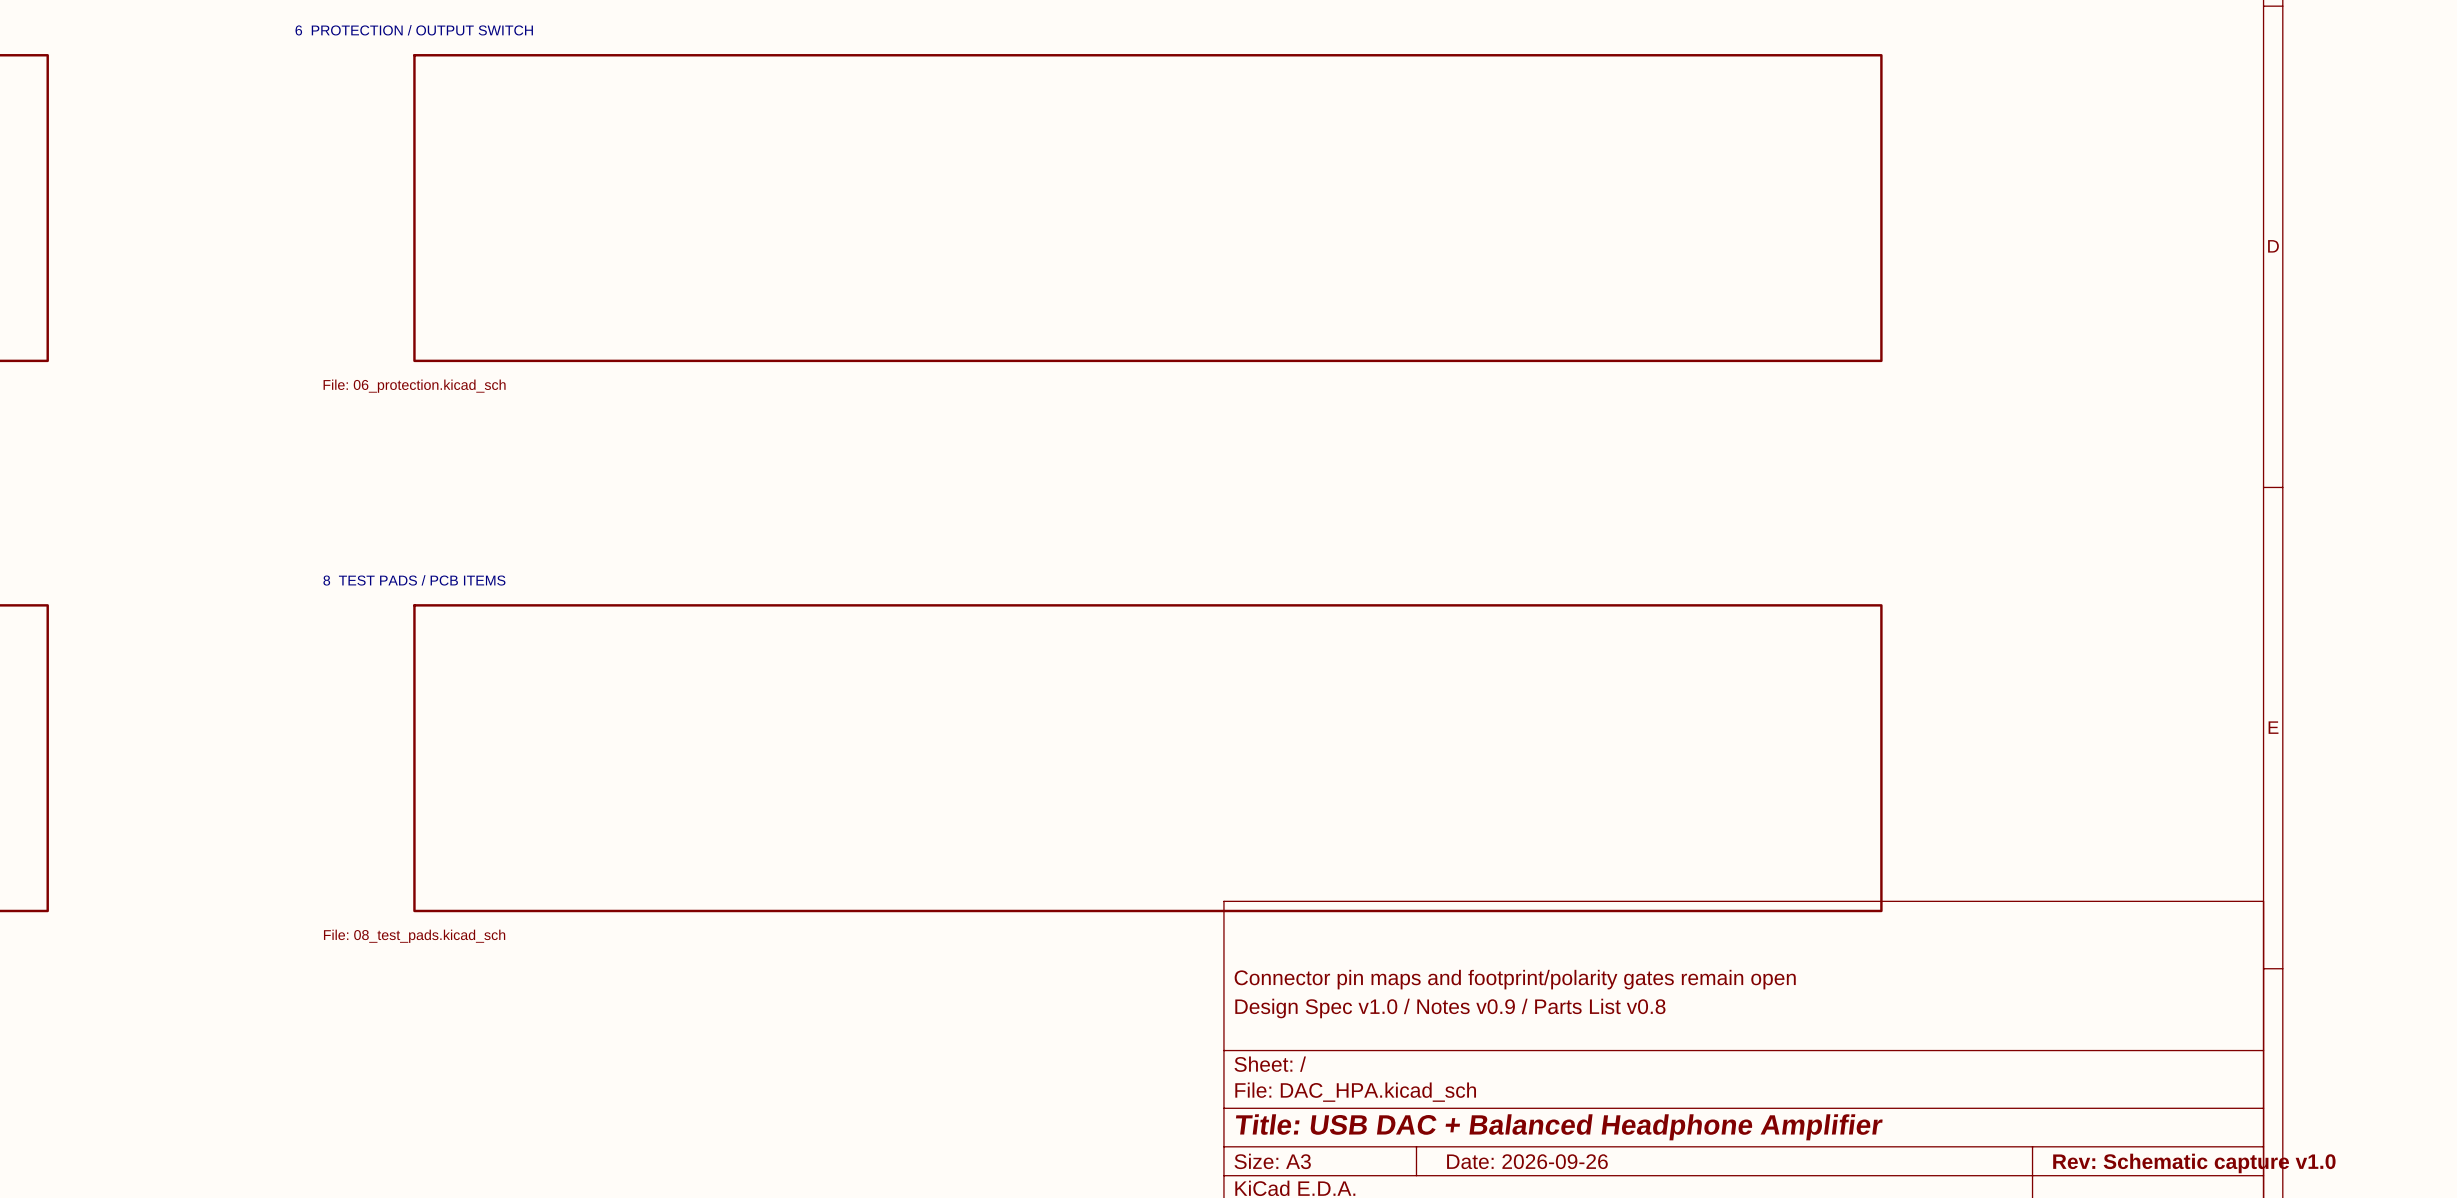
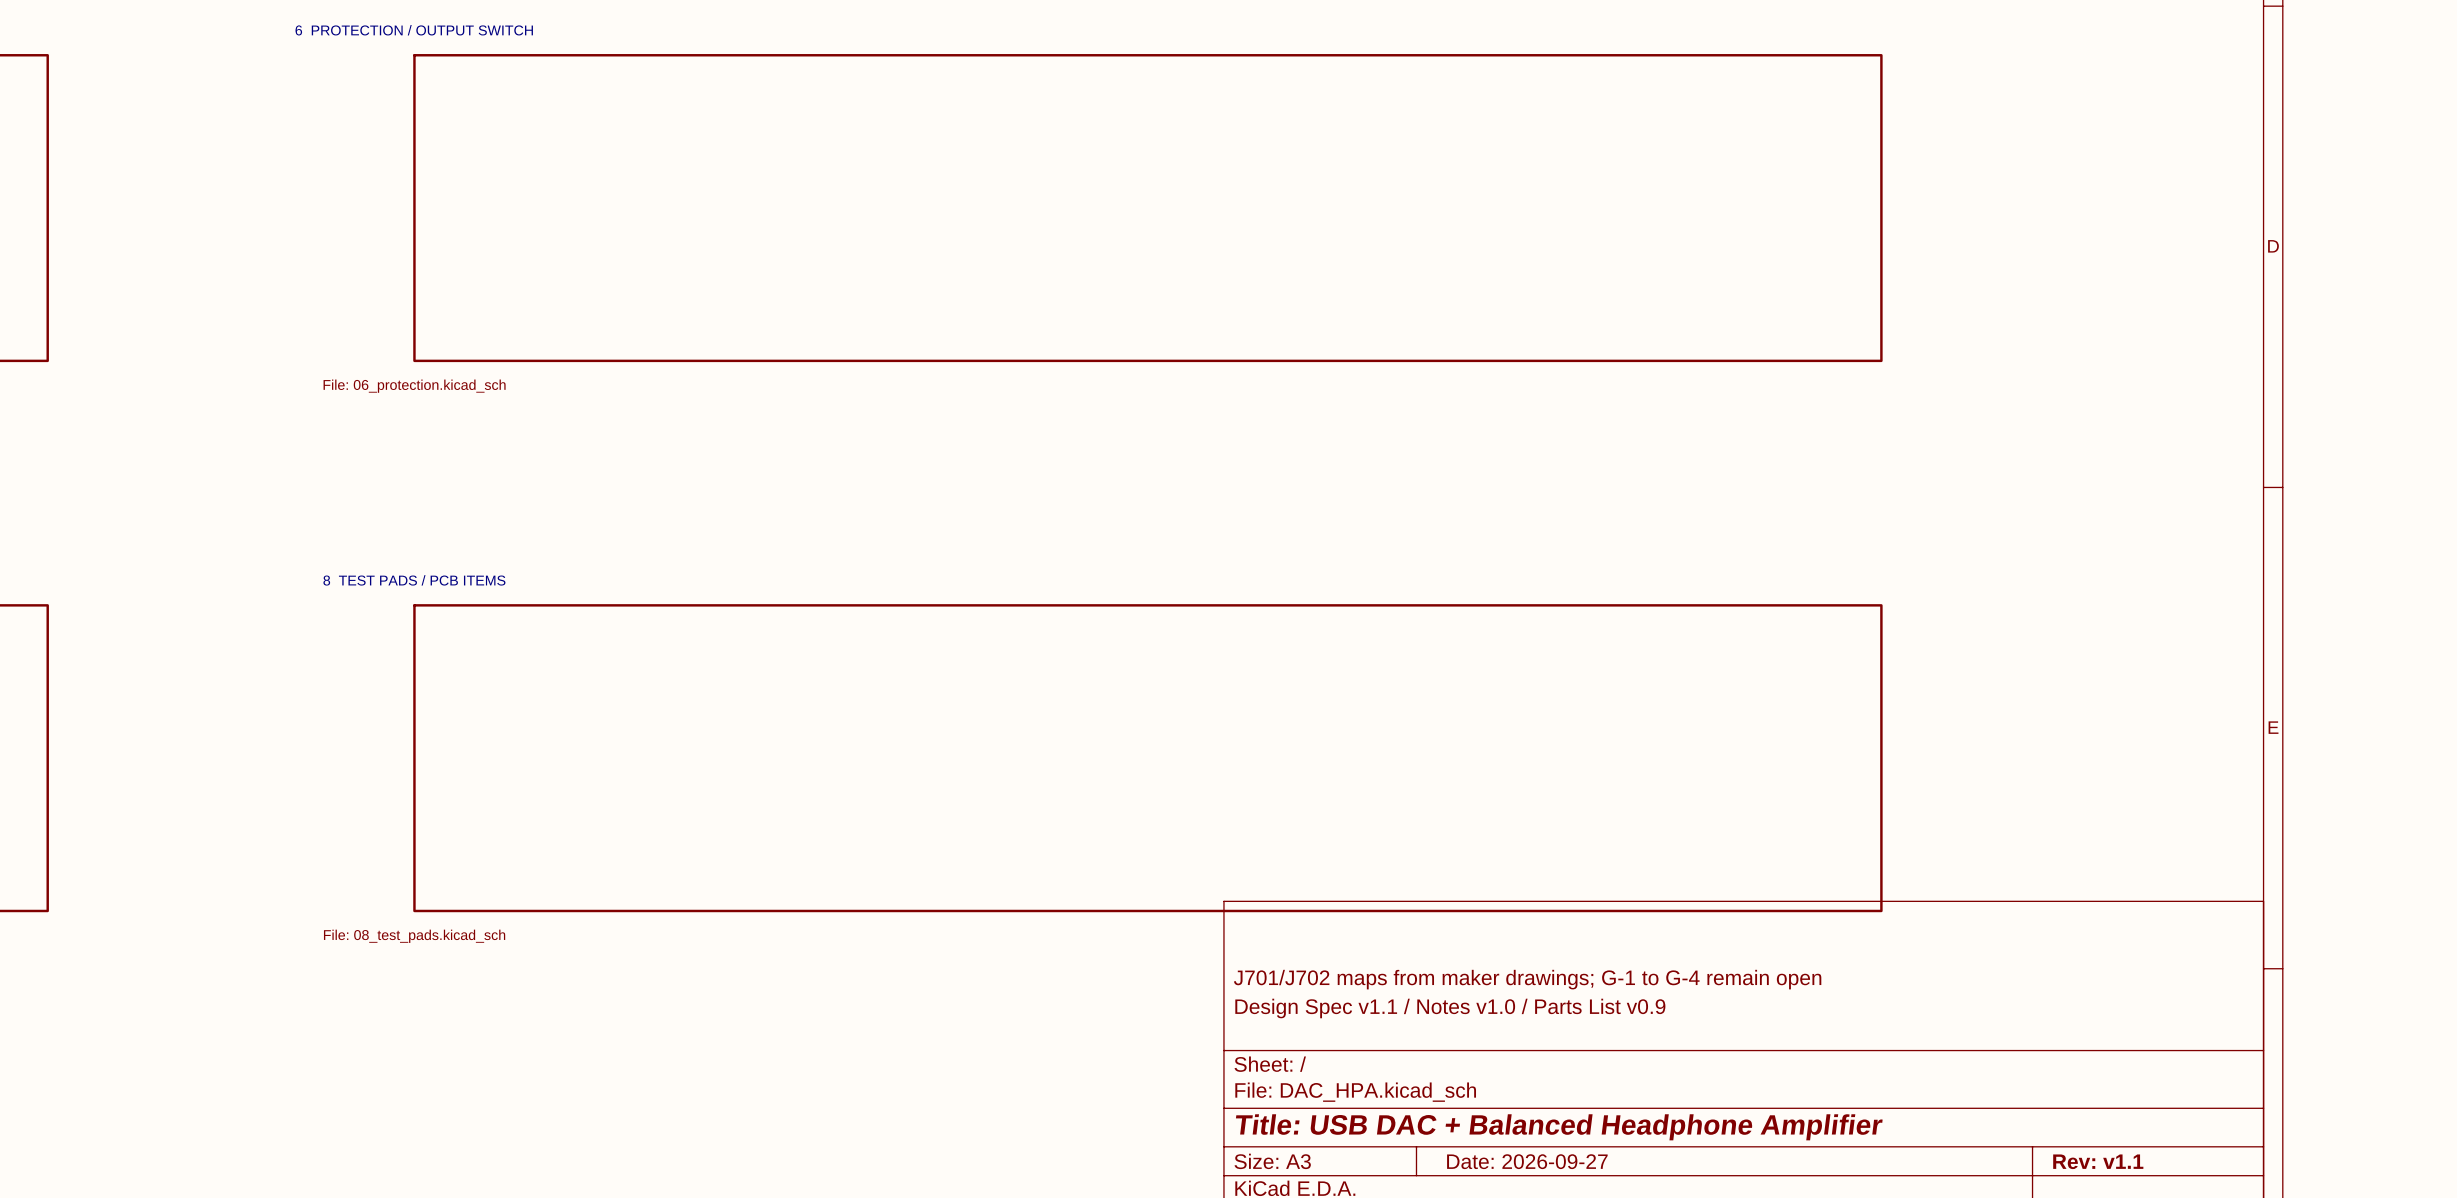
title block: Connector pin maps and footprint/polarity gates remain open (1515, 979) -> J701/J702 maps from maker drawings; G-1 to G-4 remain open (1527, 979)
title block: Design Spec v1.0 / Notes v0.9 / Parts List v0.8 (1450, 1008) -> Design Spec v1.1 / Notes v1.0 / Parts List v0.9 (1450, 1008)
title block: Date: 2026-09-26 (1527, 1161) -> Date: 2026-09-27 (1527, 1161)
title block: Rev: Schematic capture v1.0 (2194, 1163) -> Rev: v1.1 (2098, 1161)

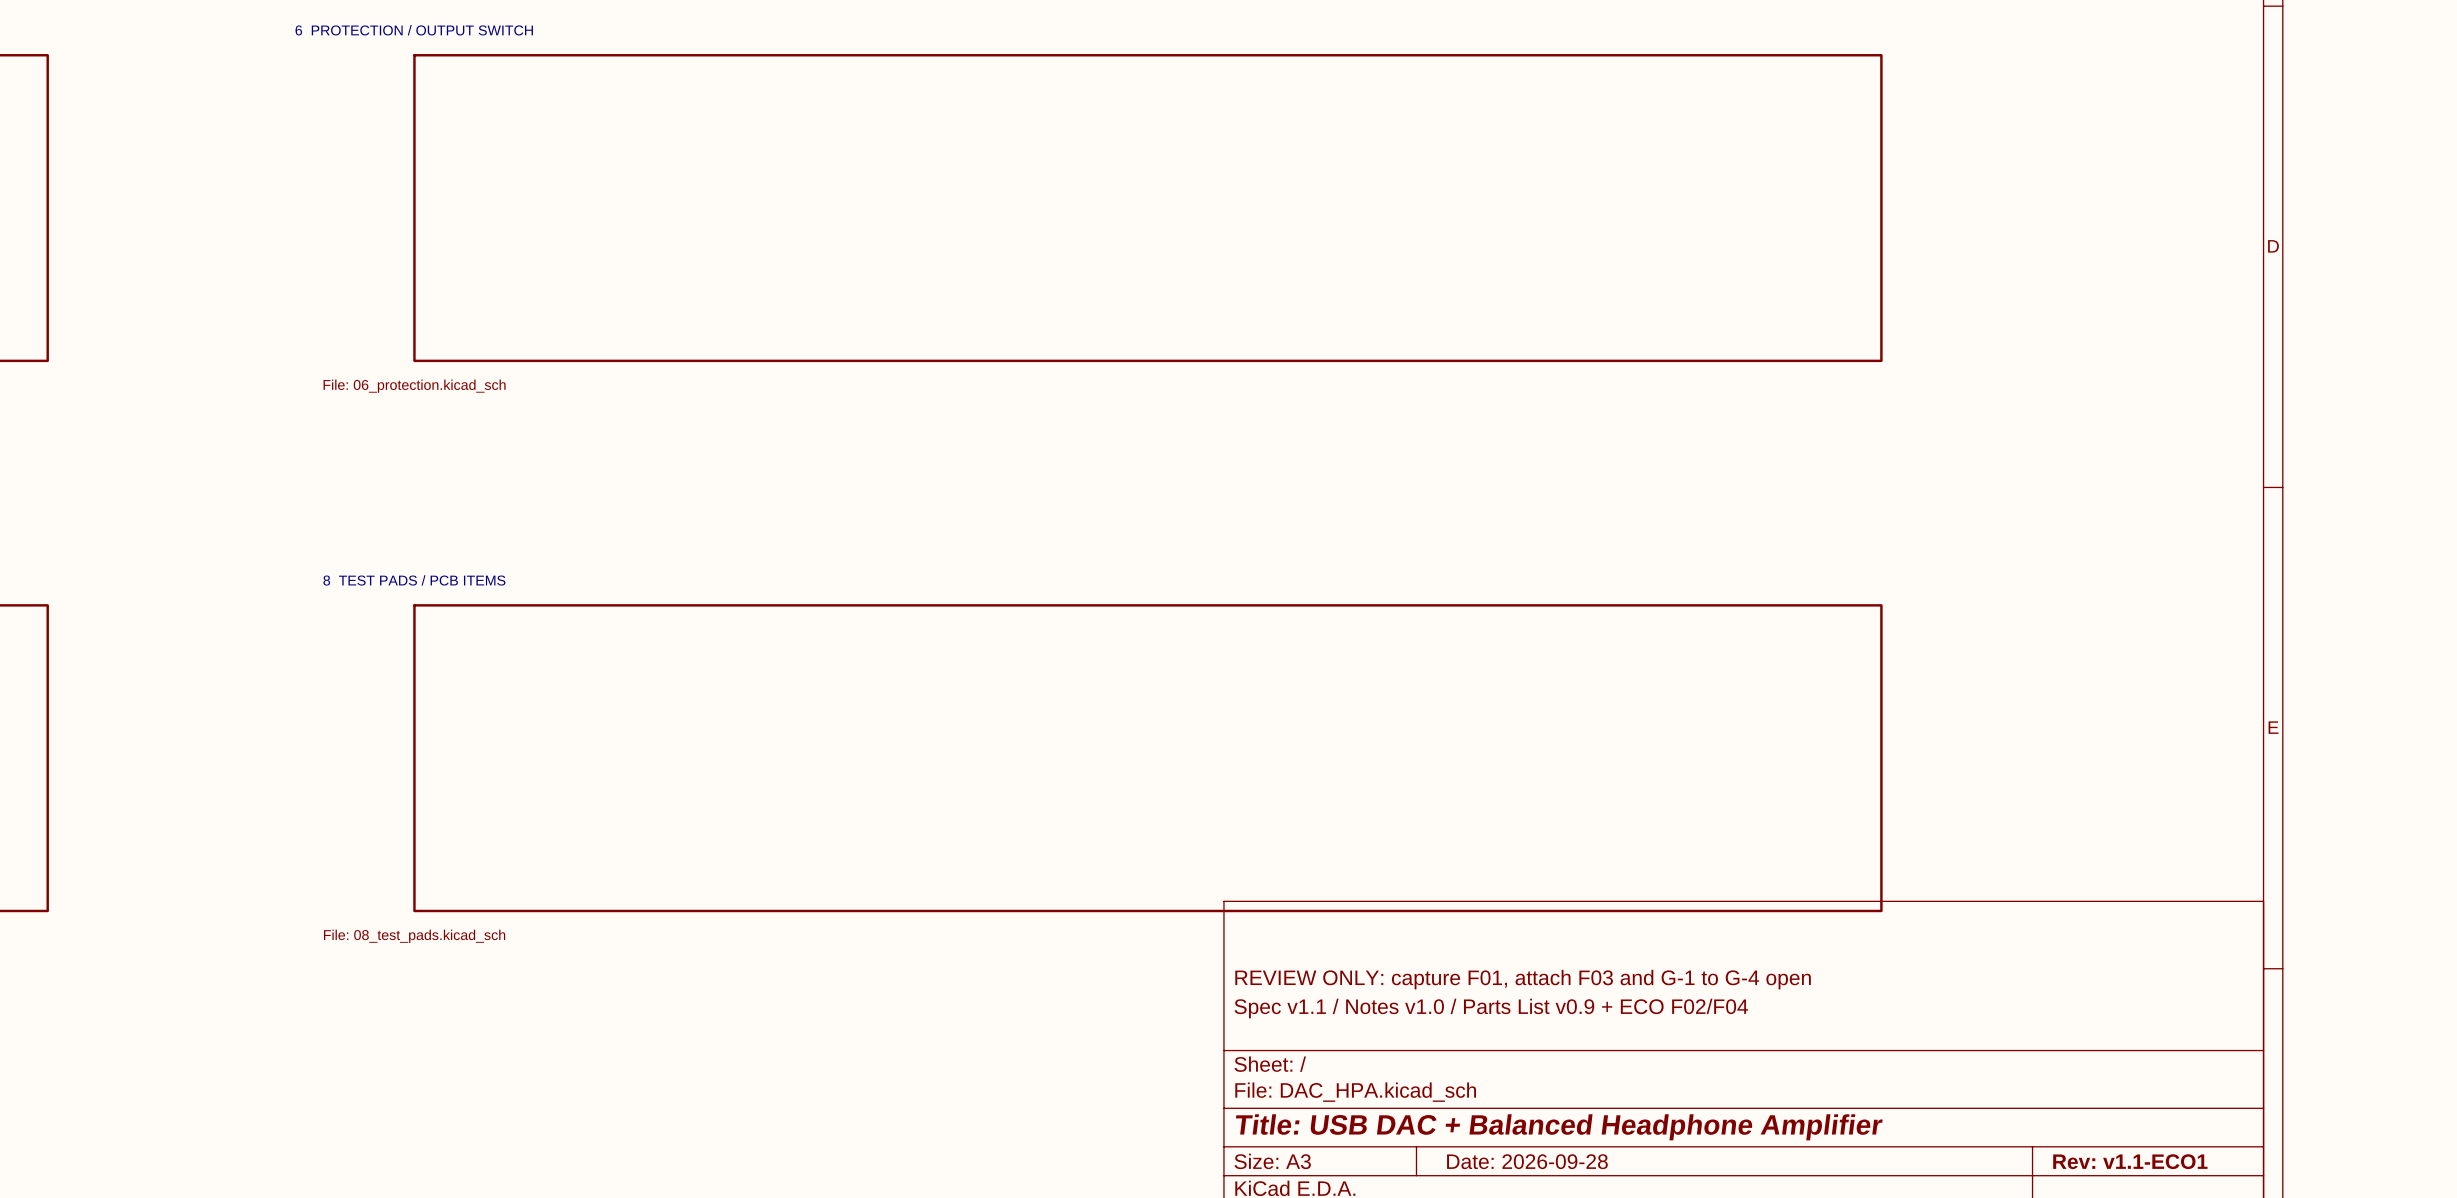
title block: J701/J702 maps from maker drawings; G-1 to G-4 remain open (1527, 979) -> REVIEW ONLY: capture F01, attach F03 and G-1 to G-4 open (1523, 979)
title block: Design Spec v1.1 / Notes v1.0 / Parts List v0.9 (1450, 1008) -> Spec v1.1 / Notes v1.0 / Parts List v0.9 + ECO F02/F04 (1491, 1008)
title block: Date: 2026-09-27 (1527, 1161) -> Date: 2026-09-28 (1527, 1161)
title block: Rev: v1.1 (2098, 1161) -> Rev: v1.1-ECO1 (2130, 1161)

